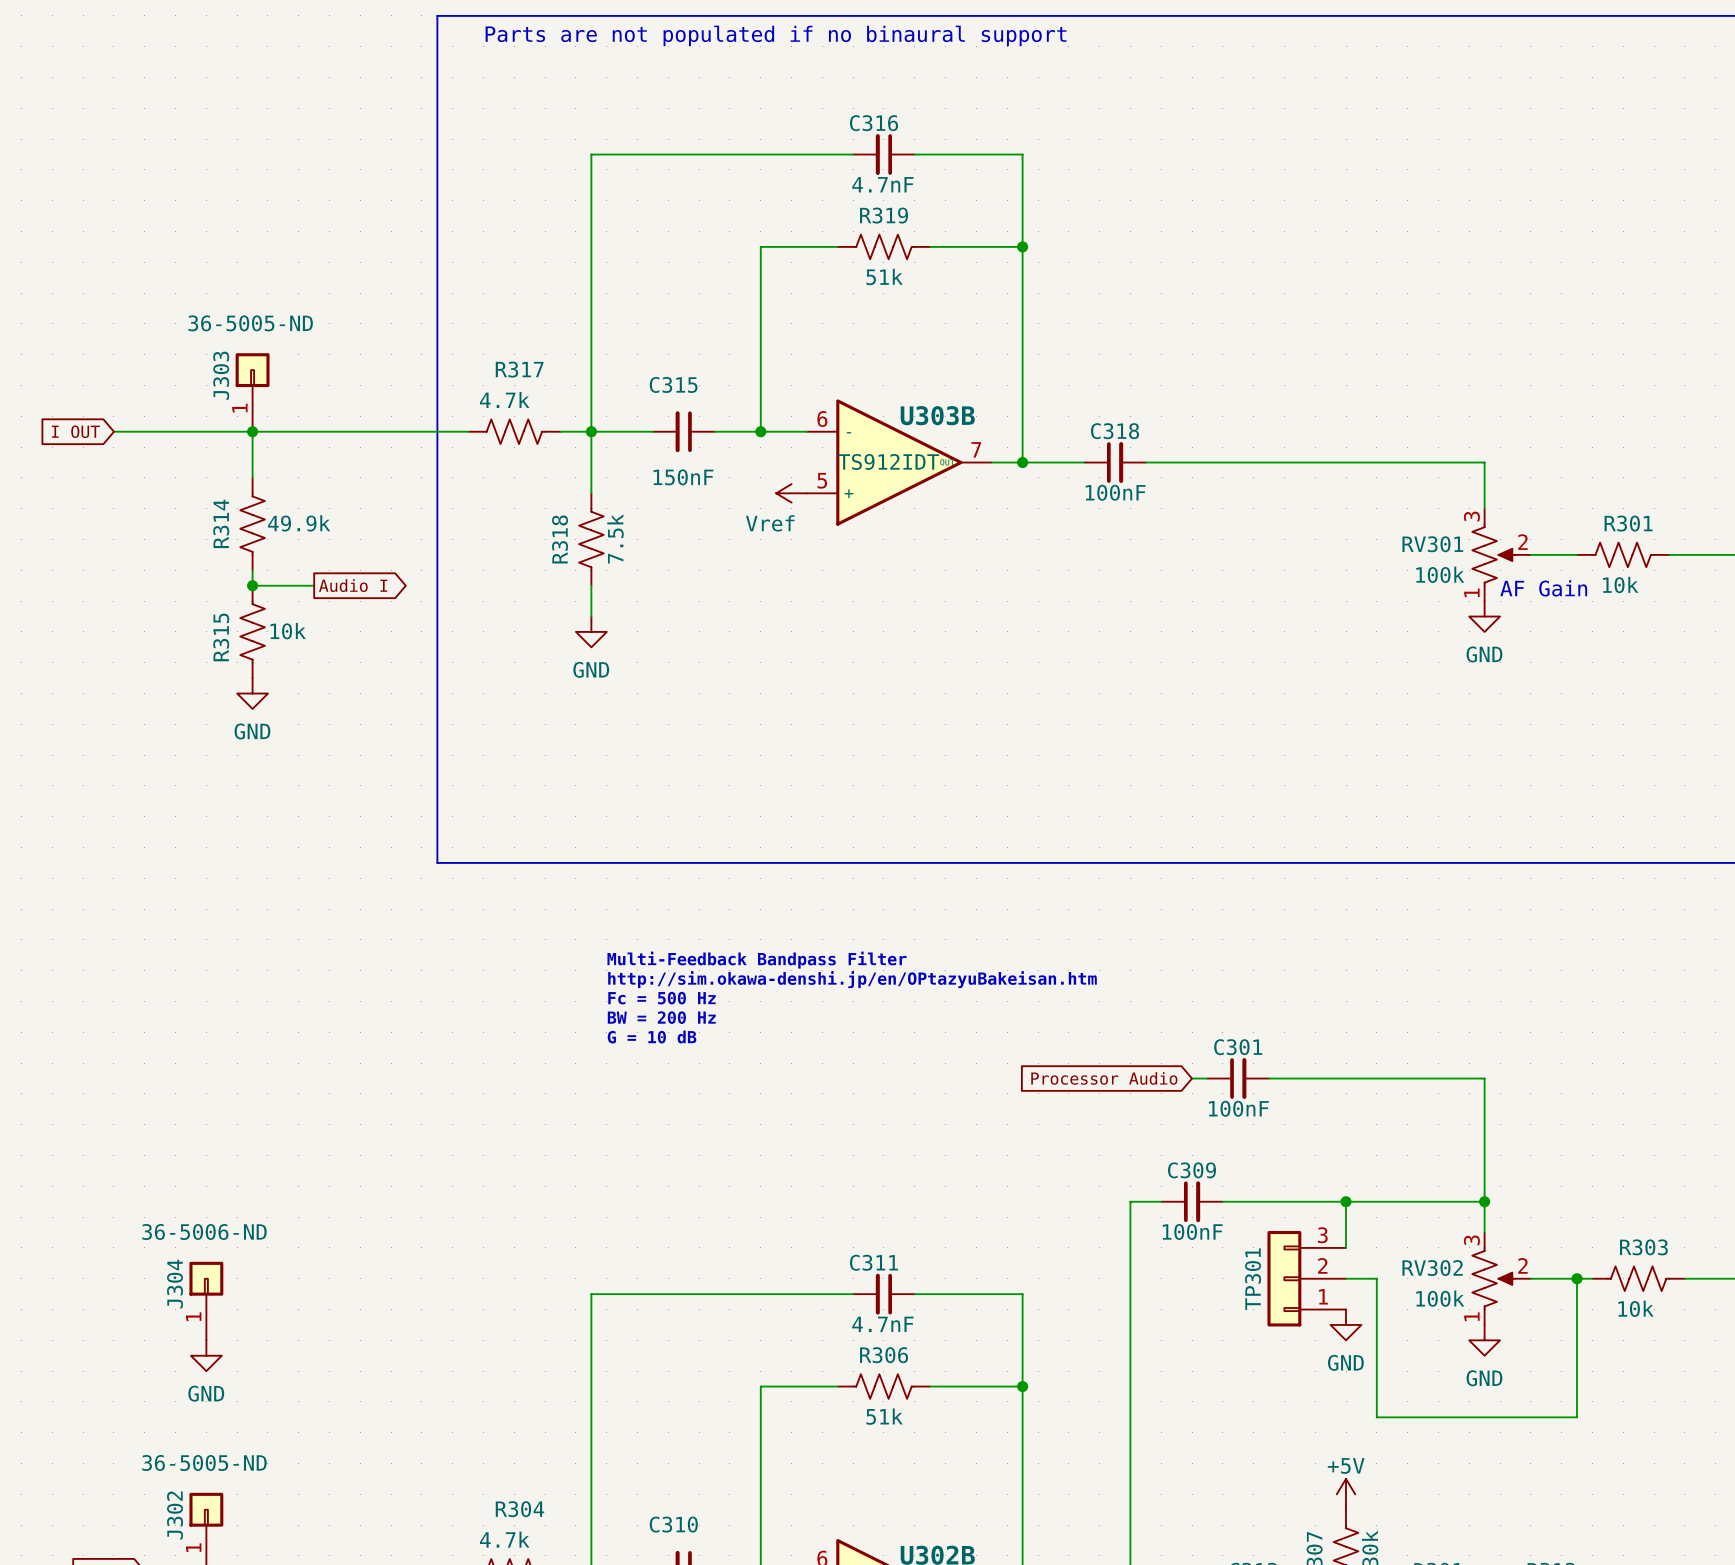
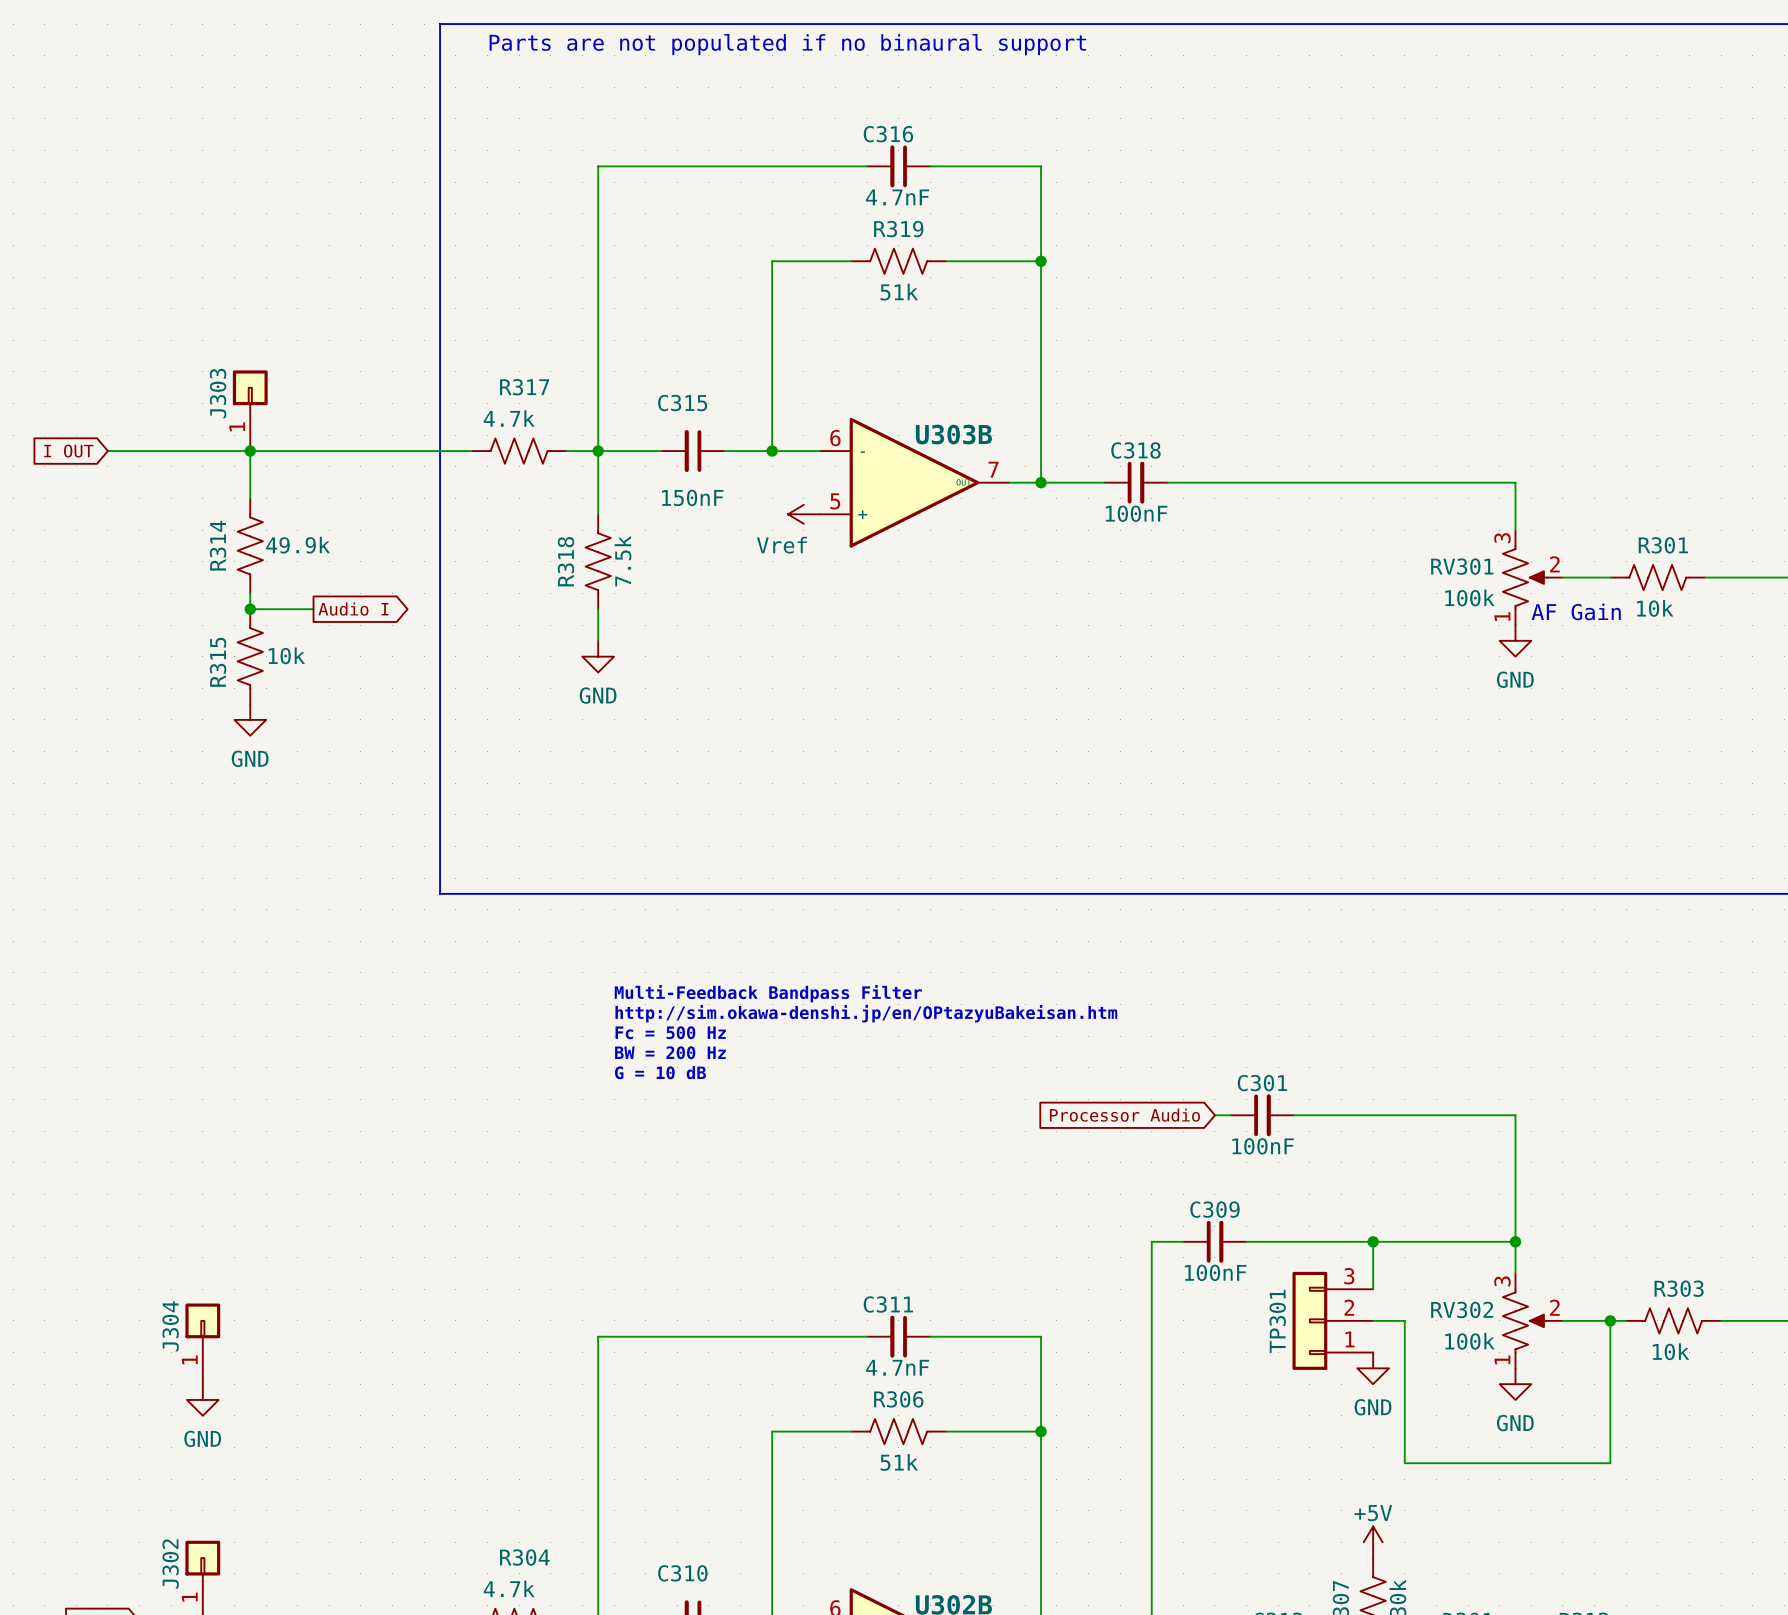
J303 value: 36-5005-ND (250, 323) -> none
U303B value: TS912IDT (888, 461) -> none
J304 value: 36-5006-ND (204, 1231) -> none
J302 value: 36-5005-ND (204, 1462) -> none

